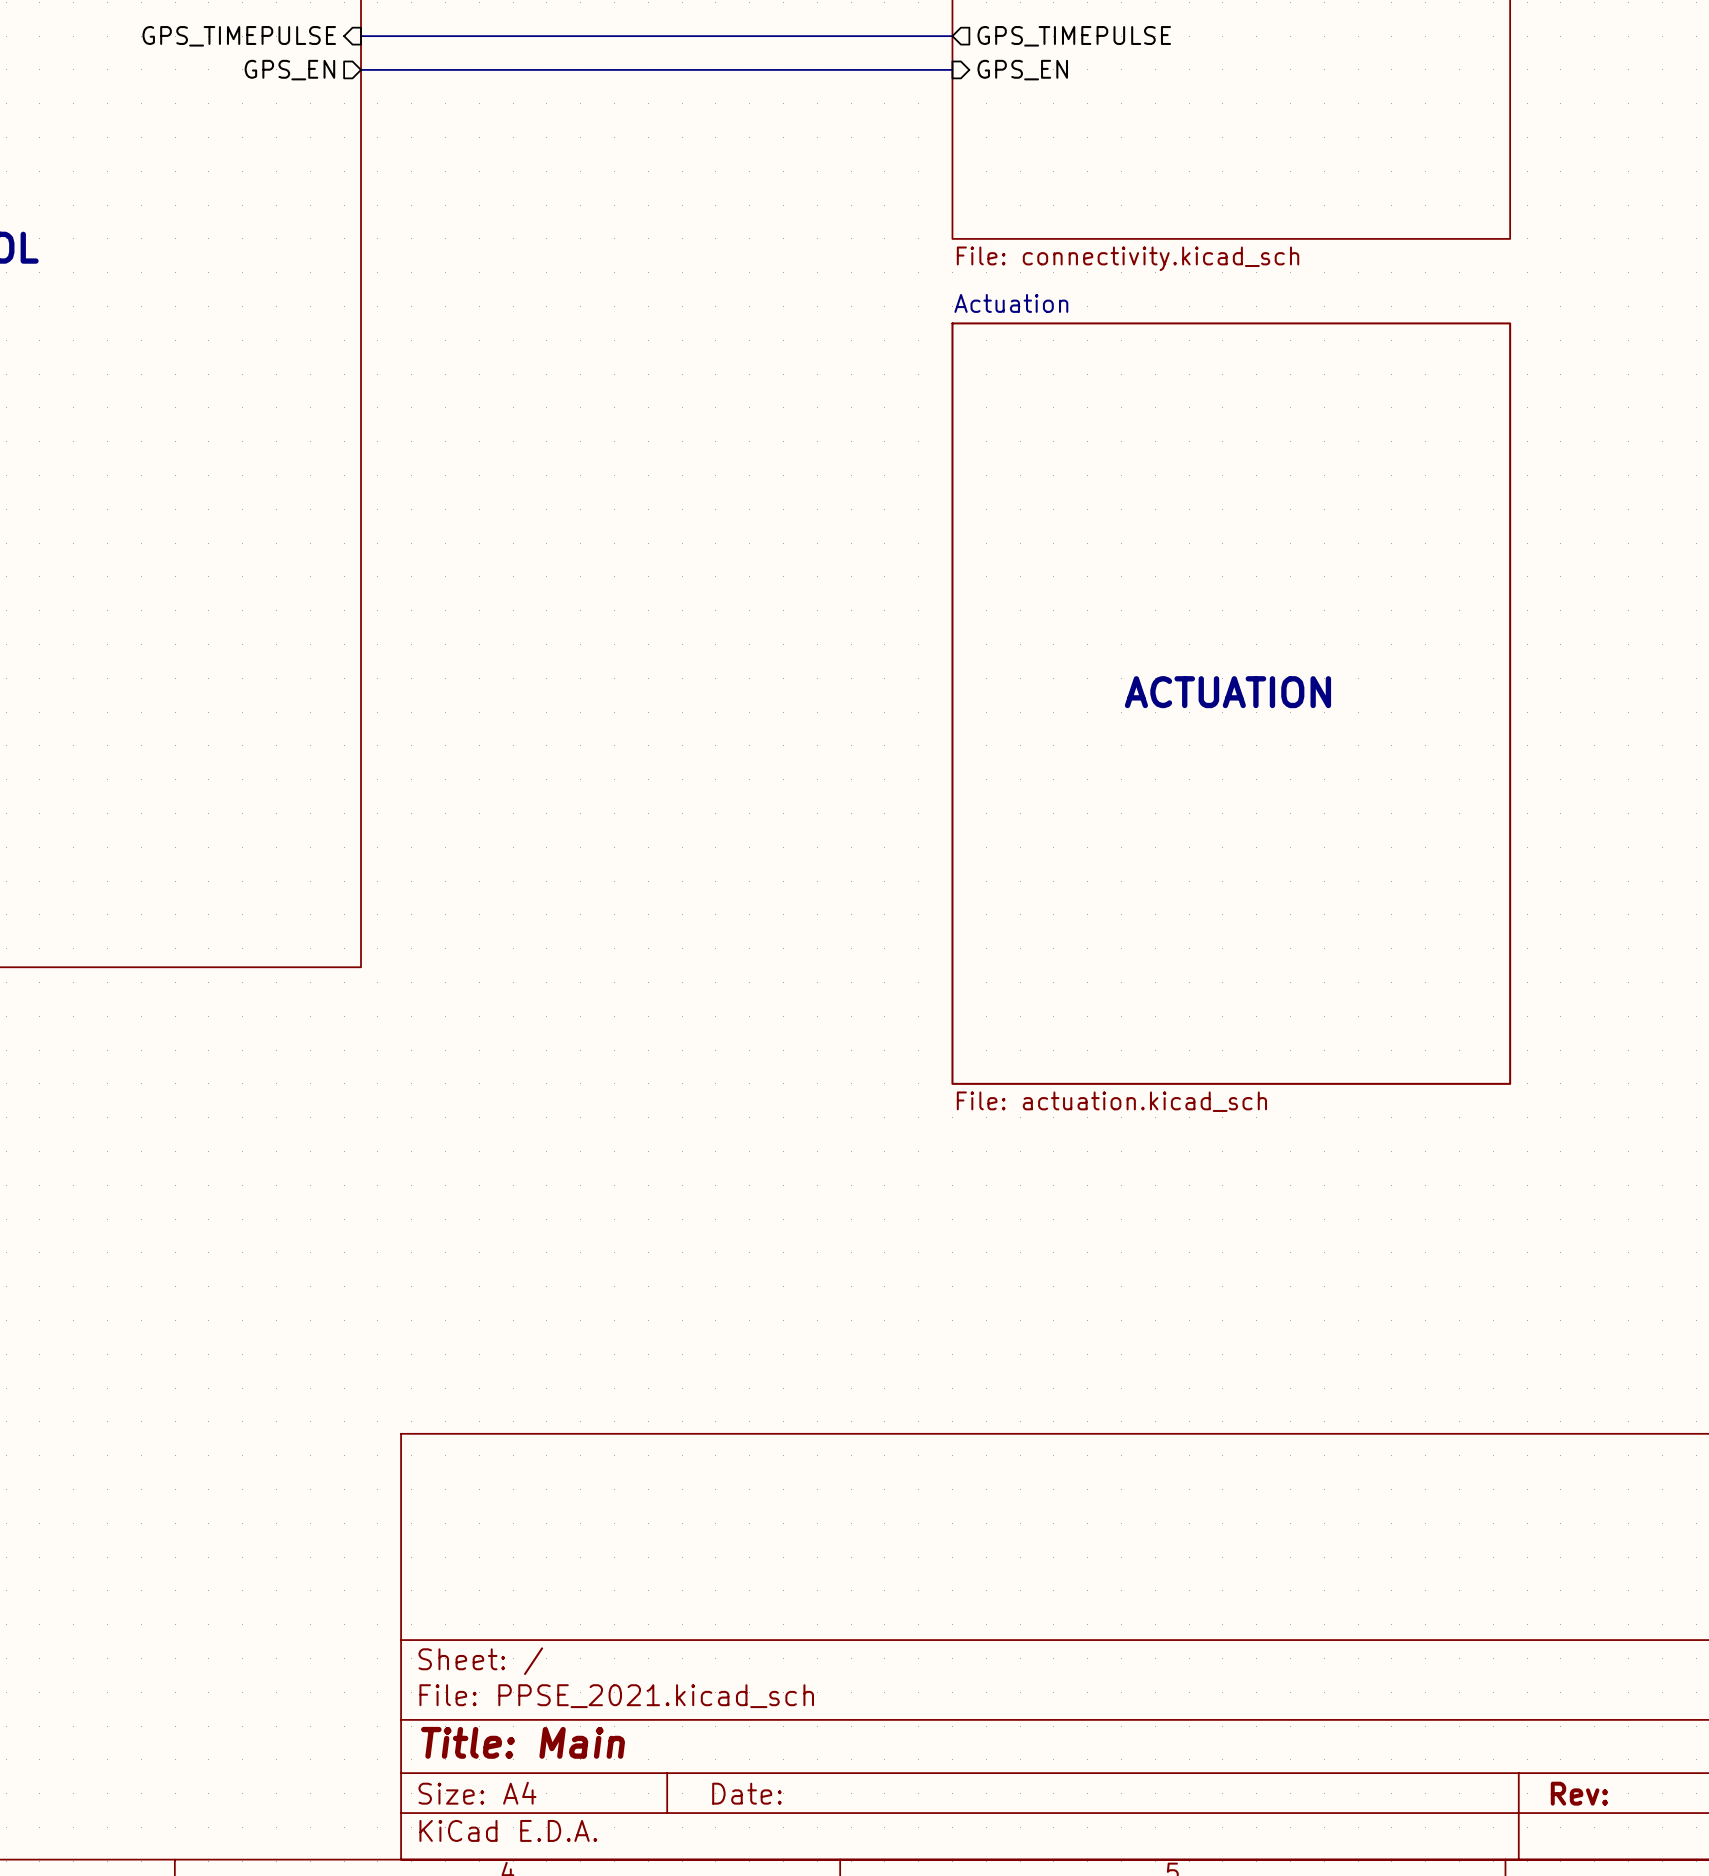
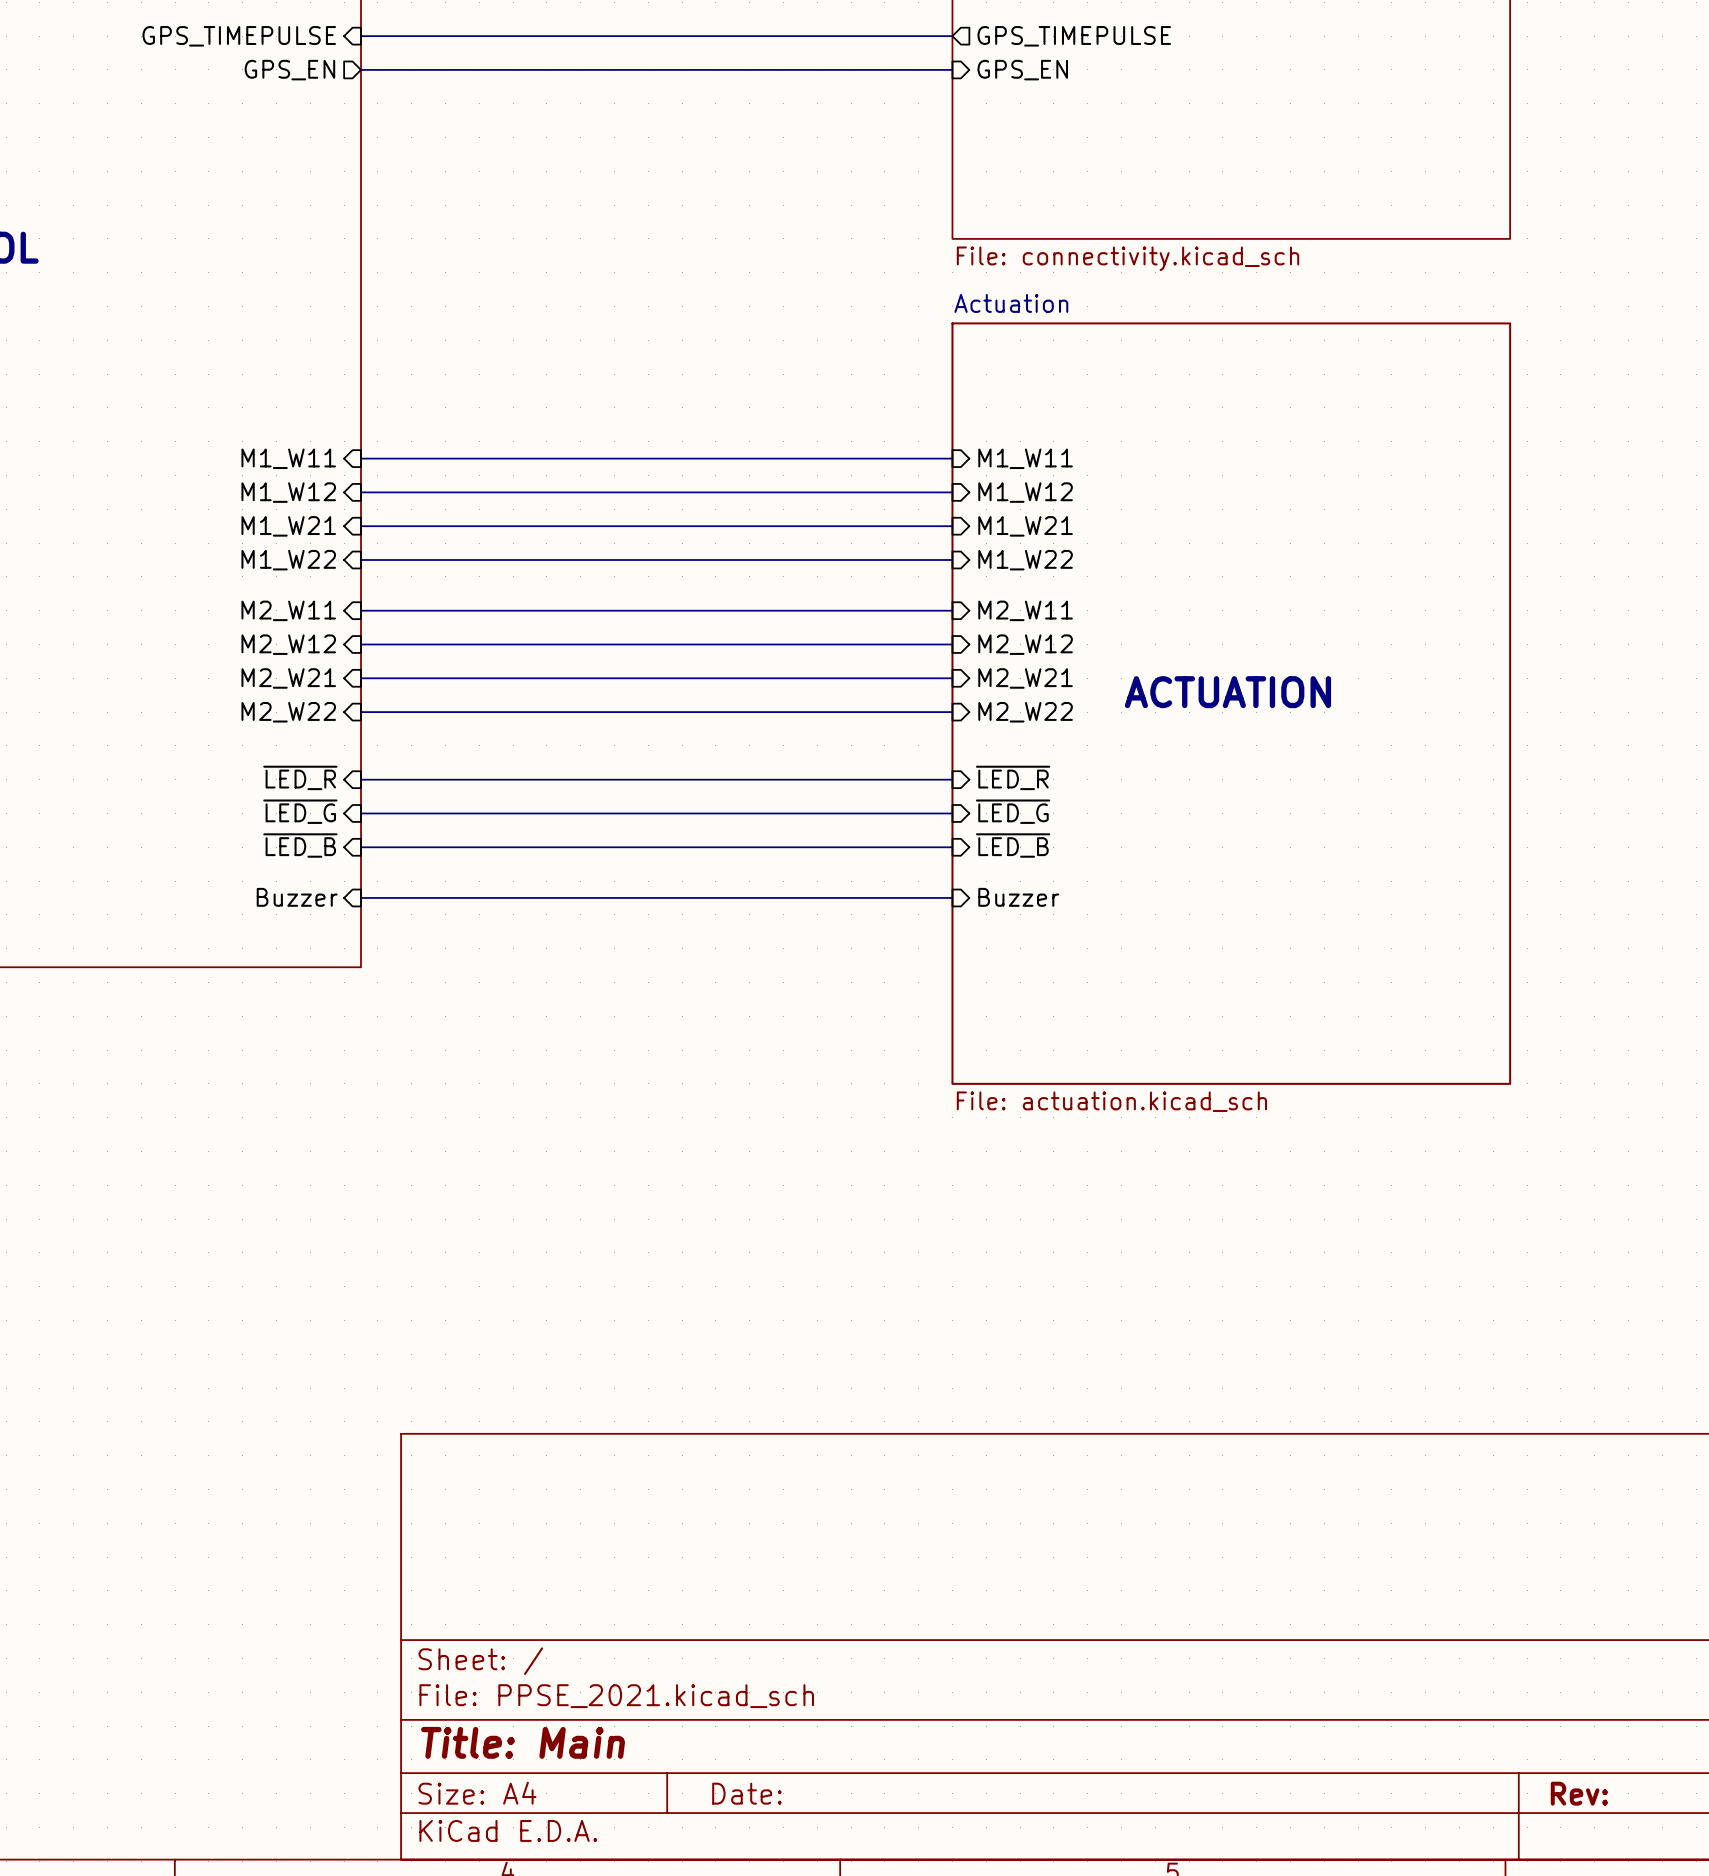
sheet pin: none -> M1_W11 (288, 458)
wire: none -> (361, 458) (952, 458)
sheet pin: none -> M1_W11 (1025, 458)
sheet pin: none -> M1_W12 (288, 492)
wire: none -> (361, 492) (952, 492)
sheet pin: none -> M1_W12 (1025, 492)
sheet pin: none -> M1_W21 (288, 526)
wire: none -> (361, 526) (952, 526)
sheet pin: none -> M1_W21 (1025, 526)
sheet pin: none -> M1_W22 (288, 560)
wire: none -> (361, 560) (952, 560)
sheet pin: none -> M1_W22 (1025, 560)
sheet pin: none -> M2_W11 (288, 610)
wire: none -> (361, 610) (952, 610)
sheet pin: none -> M2_W11 (1025, 610)
sheet pin: none -> M2_W12 (288, 644)
wire: none -> (361, 644) (952, 644)
sheet pin: none -> M2_W12 (1025, 644)
sheet pin: none -> M2_W21 (288, 678)
wire: none -> (361, 678) (952, 678)
sheet pin: none -> M2_W21 (1025, 678)
sheet pin: none -> M2_W22 (288, 712)
wire: none -> (361, 712) (952, 712)
sheet pin: none -> M2_W22 (1025, 712)
sheet pin: none -> ~{LED_R} (300, 777)
sheet pin: none -> ~{LED_R} (1013, 777)
wire: none -> (361, 779) (952, 779)
sheet pin: none -> ~{LED_G} (300, 811)
sheet pin: none -> ~{LED_G} (1013, 811)
wire: none -> (361, 813) (952, 813)
sheet pin: none -> ~{LED_B} (300, 845)
sheet pin: none -> ~{LED_B} (1013, 845)
wire: none -> (361, 847) (952, 847)
sheet pin: none -> Buzzer (297, 897)
wire: none -> (361, 897) (952, 897)
sheet pin: none -> Buzzer (1018, 897)

